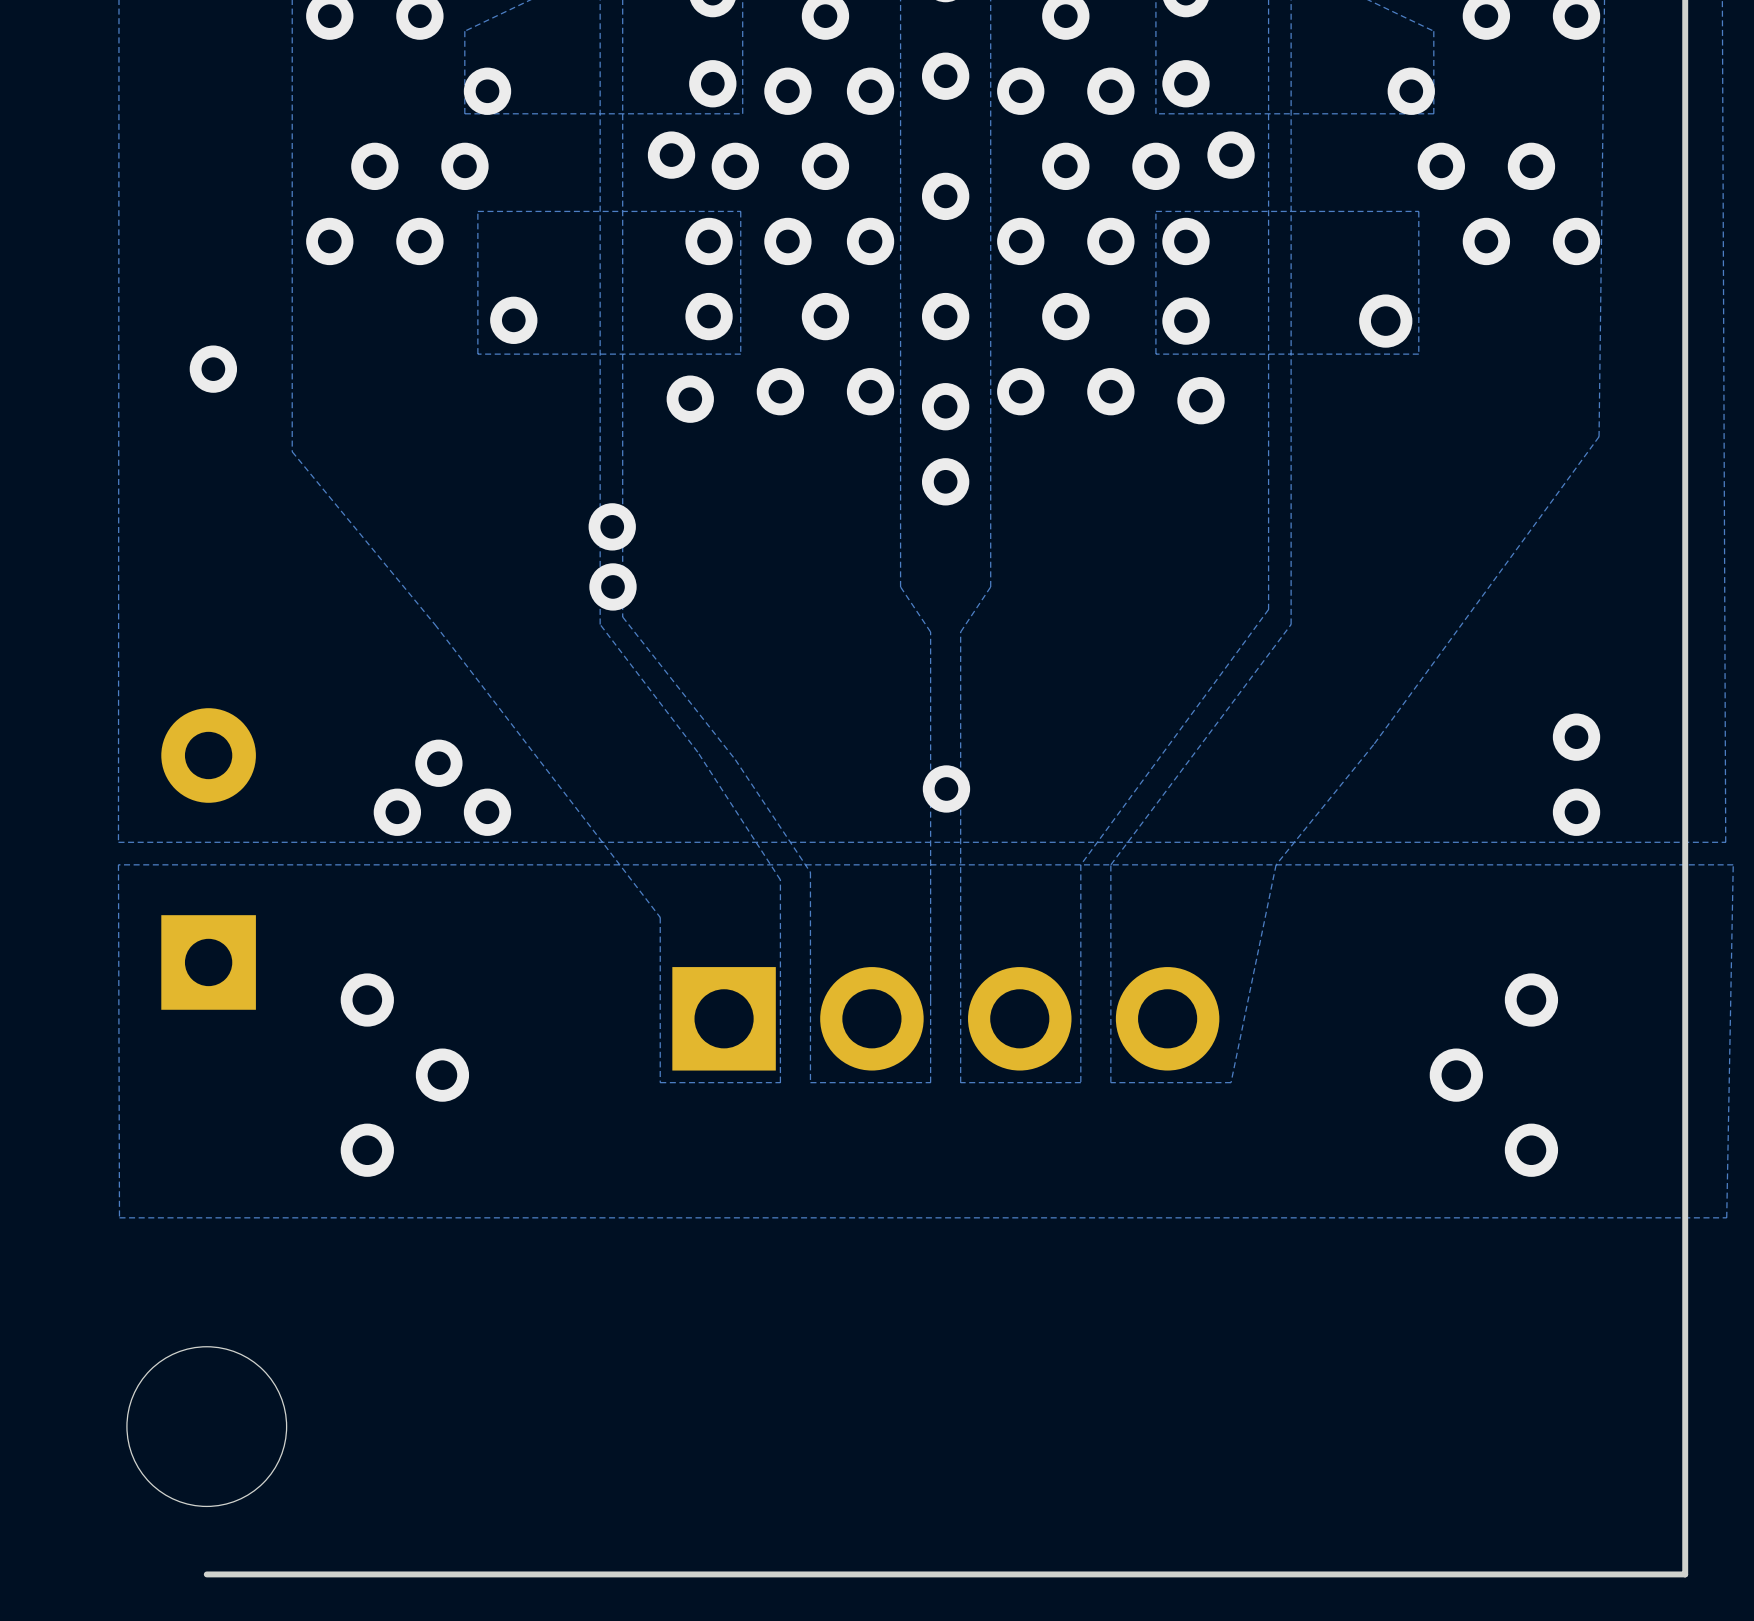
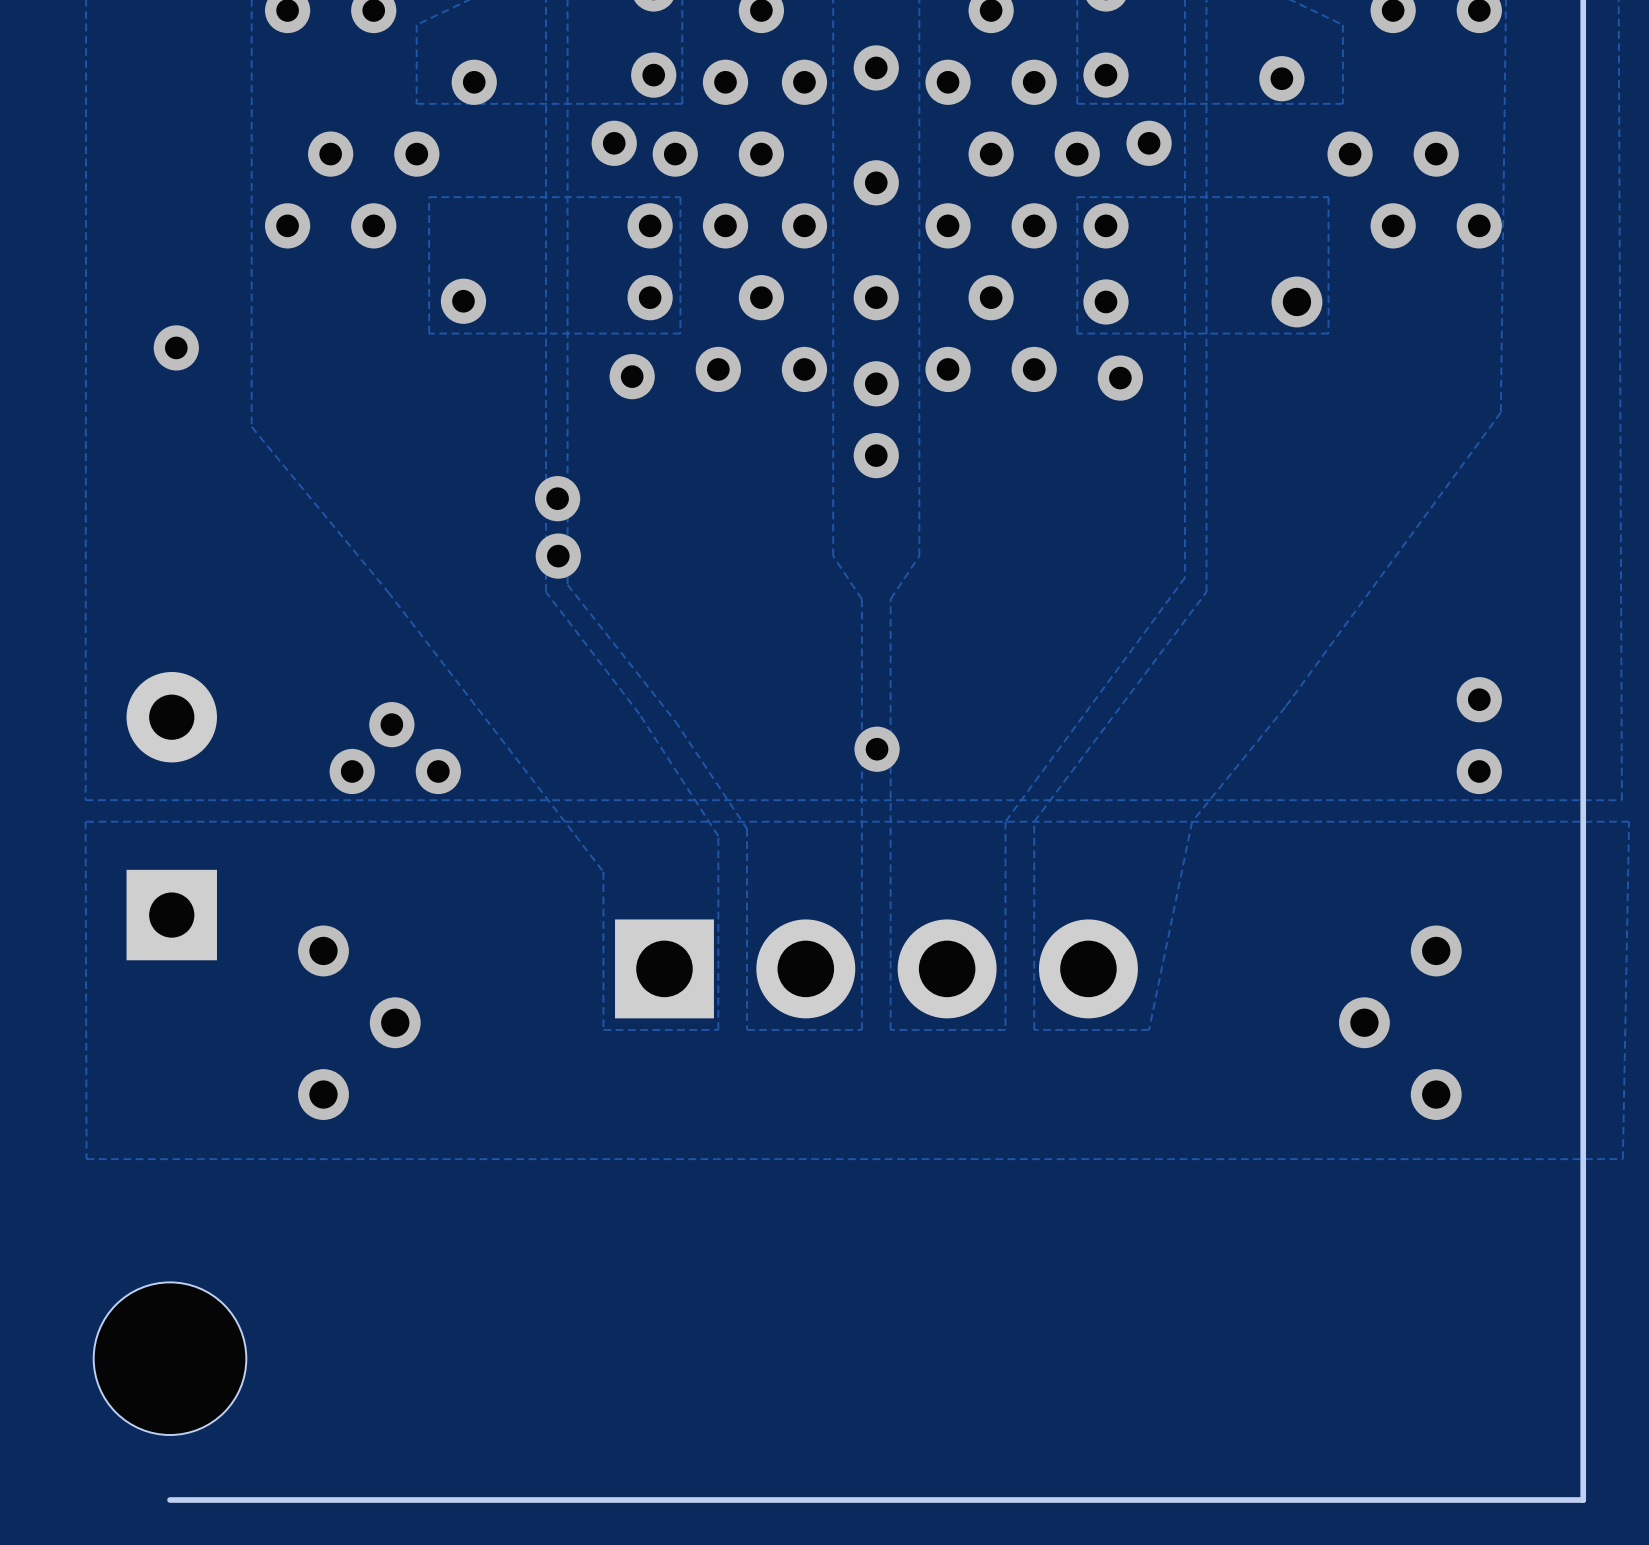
via position: (487, 91) -> (474, 82)
via position: (1411, 91) -> (1281, 78)

